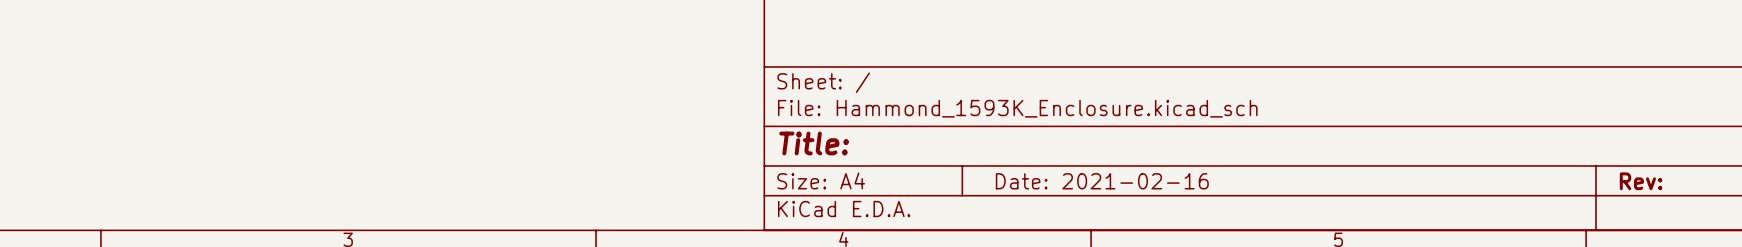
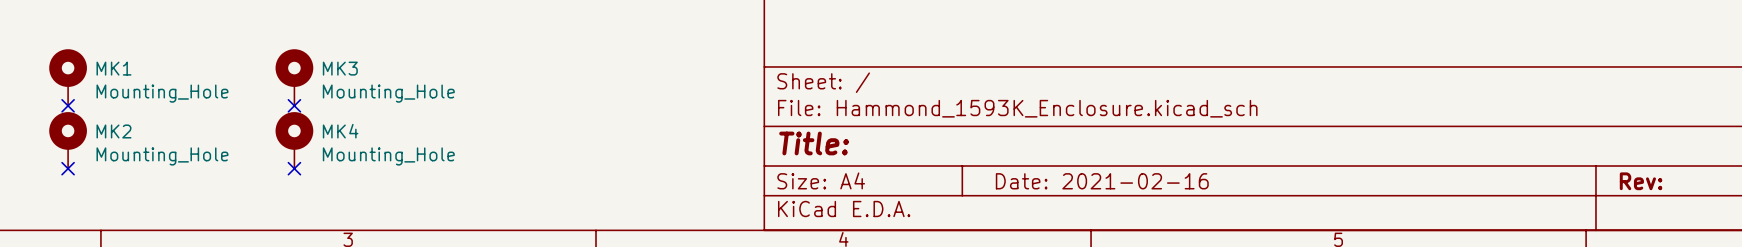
MK1: none -> Mounting_Hole (68, 77)
MK3: none -> Mounting_Hole (294, 77)
no-connect mark: none -> (68, 105)
no-connect mark: none -> (294, 105)
MK2: none -> Mounting_Hole (68, 140)
MK4: none -> Mounting_Hole (294, 140)
no-connect mark: none -> (68, 168)
no-connect mark: none -> (294, 168)

